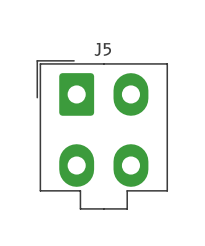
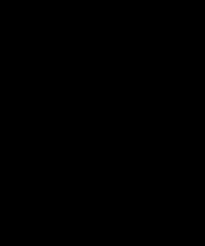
J5: (102, 134) -> none

